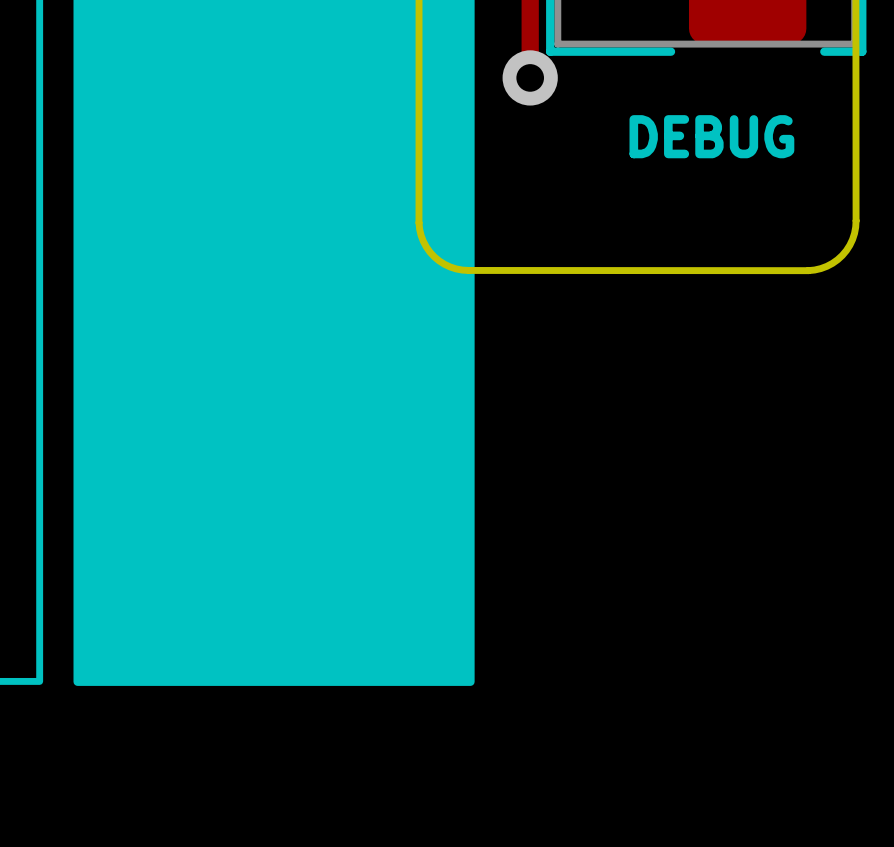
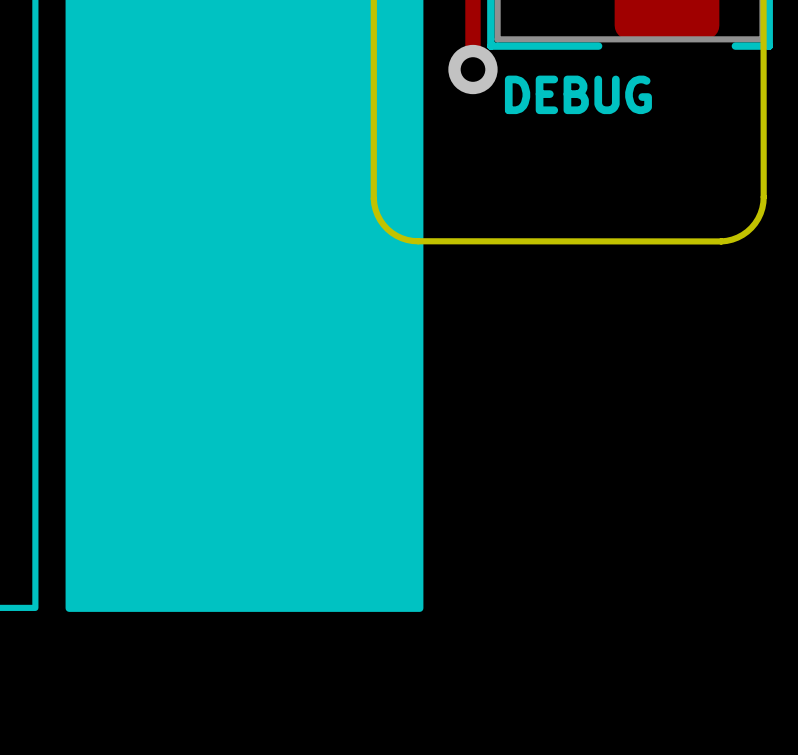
part text position: DEBUG (711, 136) -> DEBUG (578, 94)

